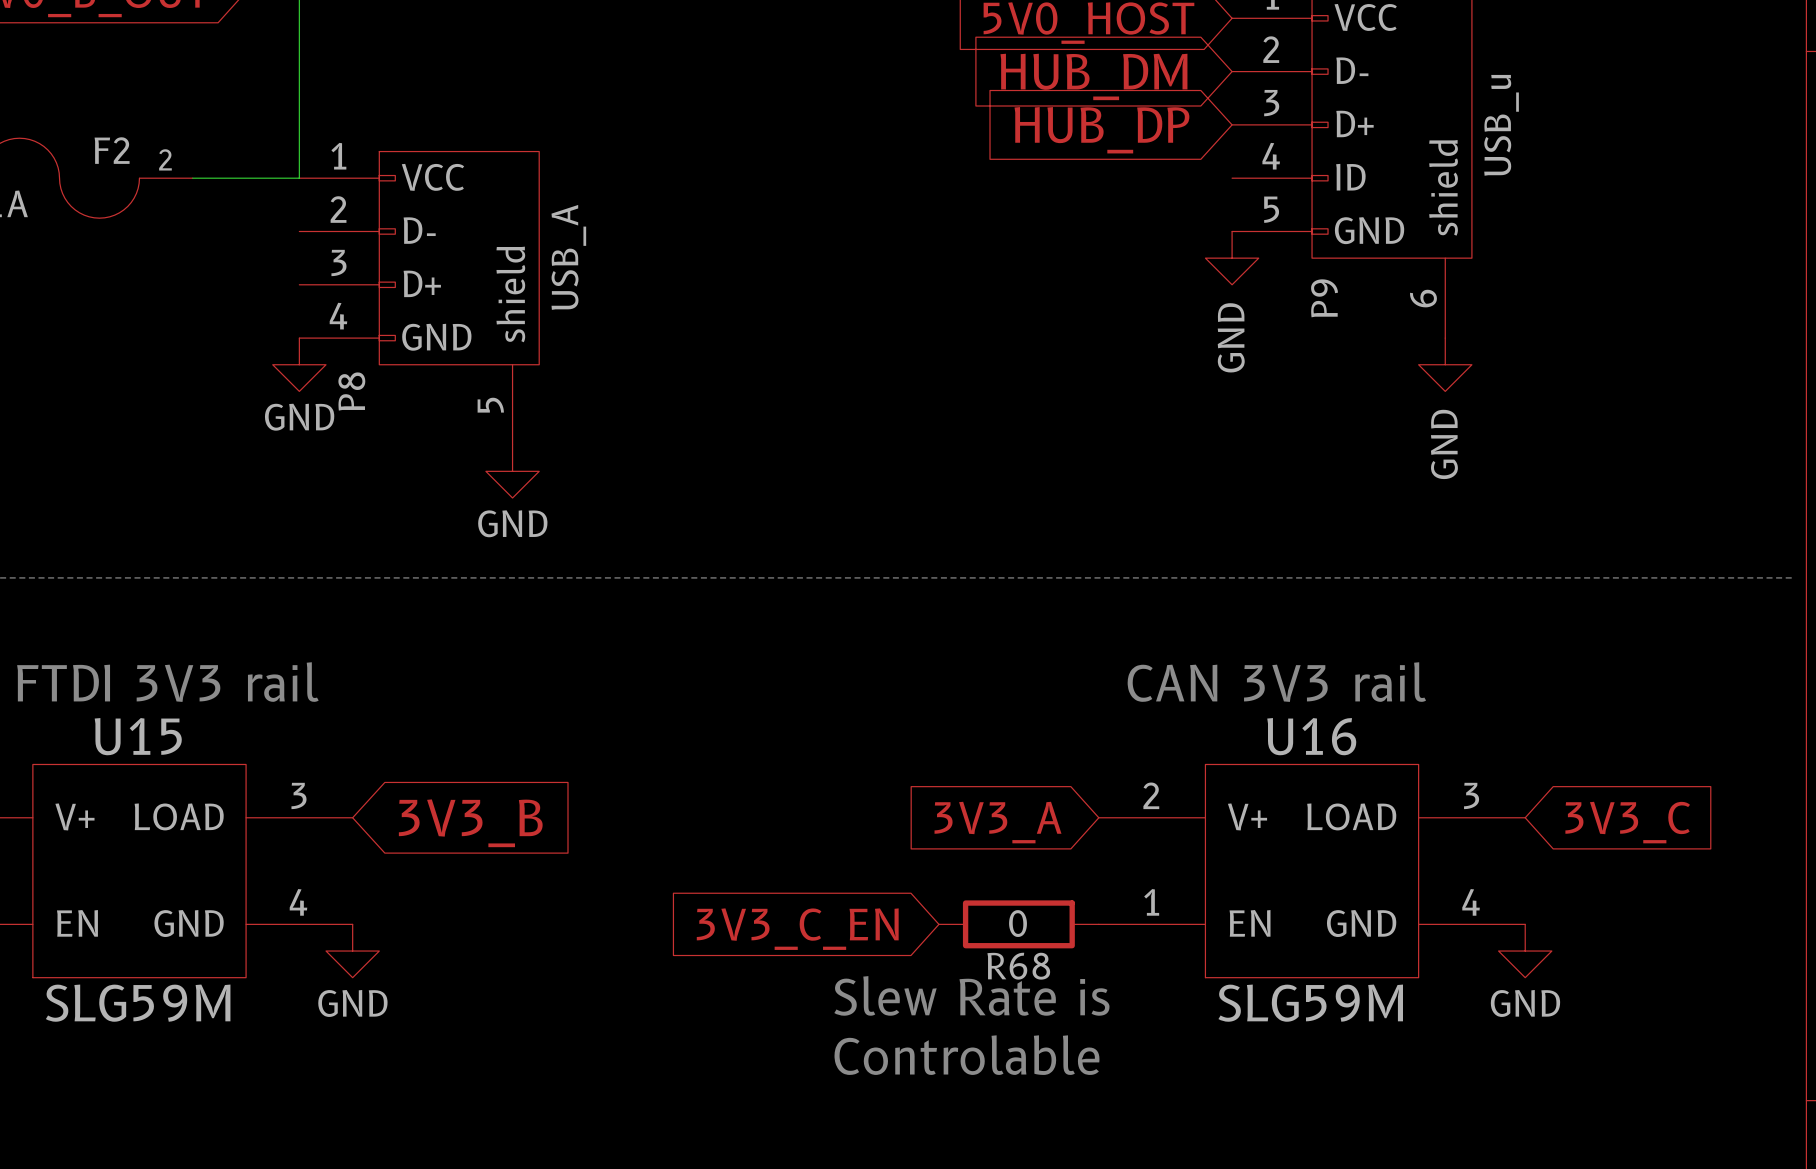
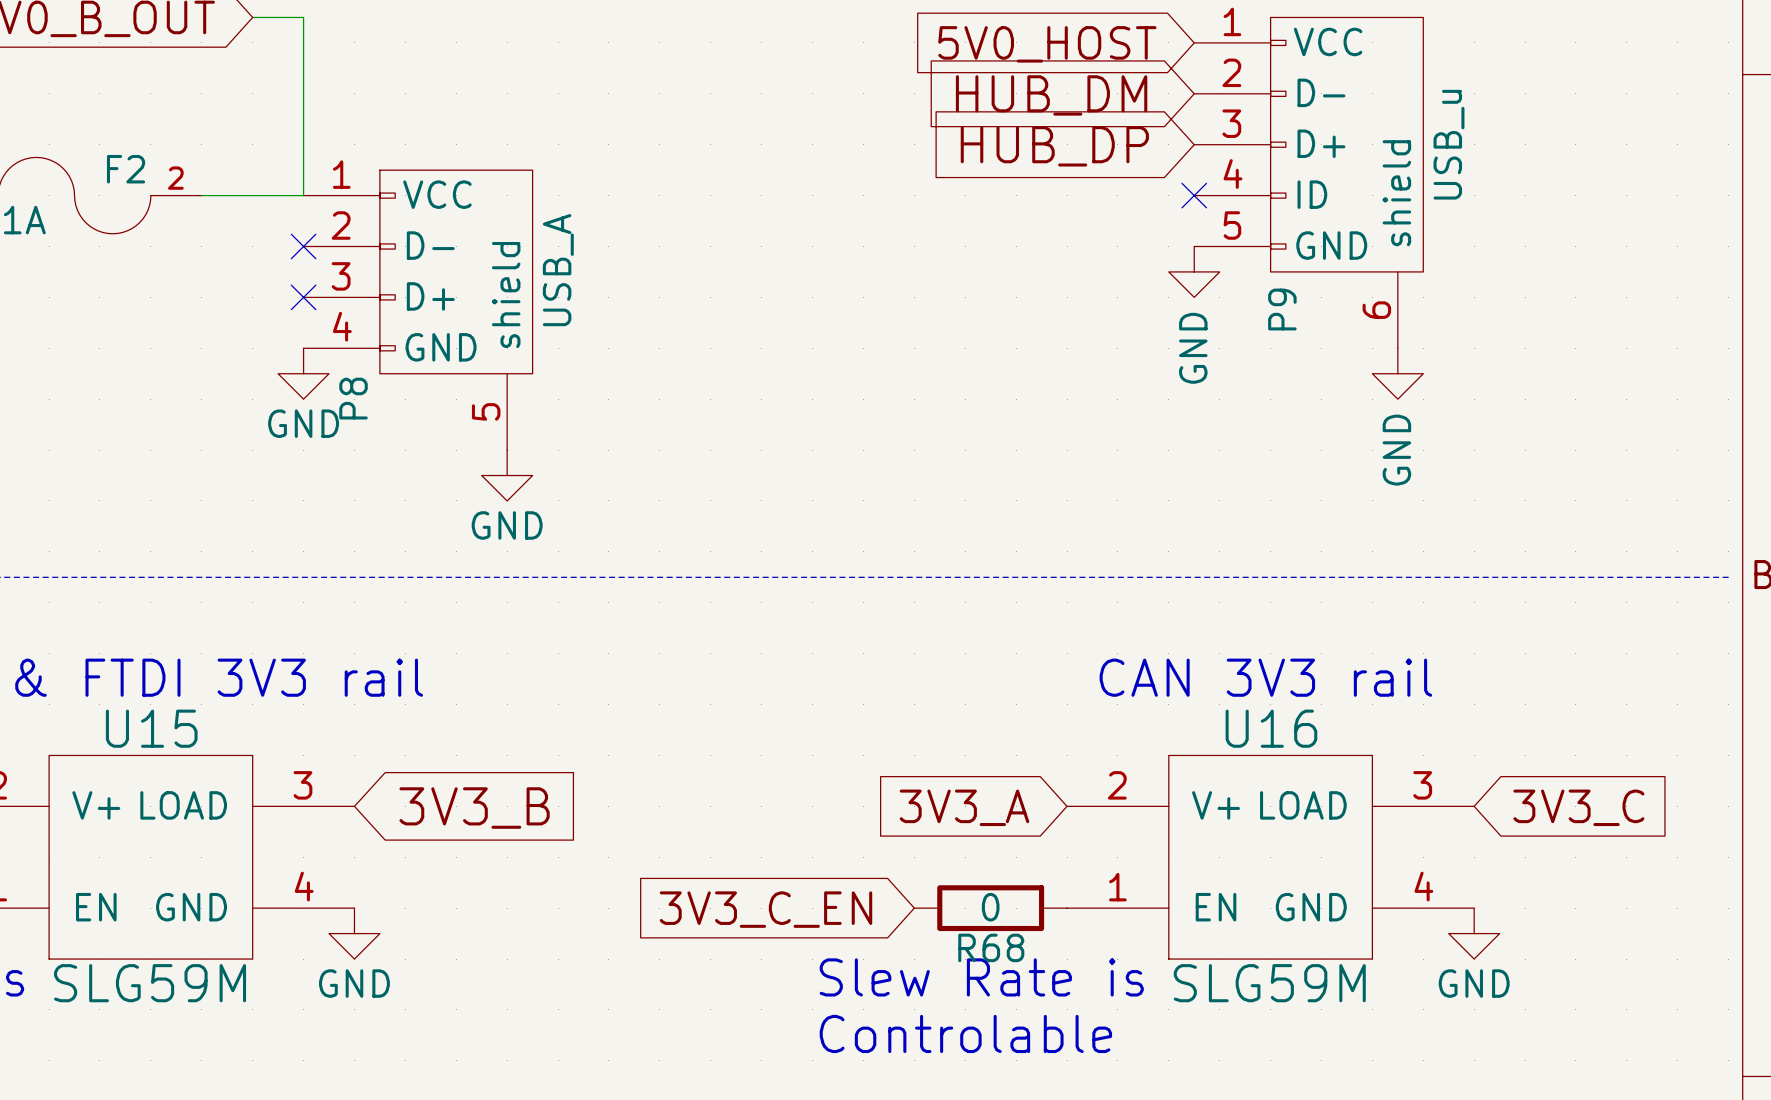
no-connect mark: none -> (1194, 195)
no-connect mark: none -> (303, 246)
no-connect mark: none -> (303, 297)

